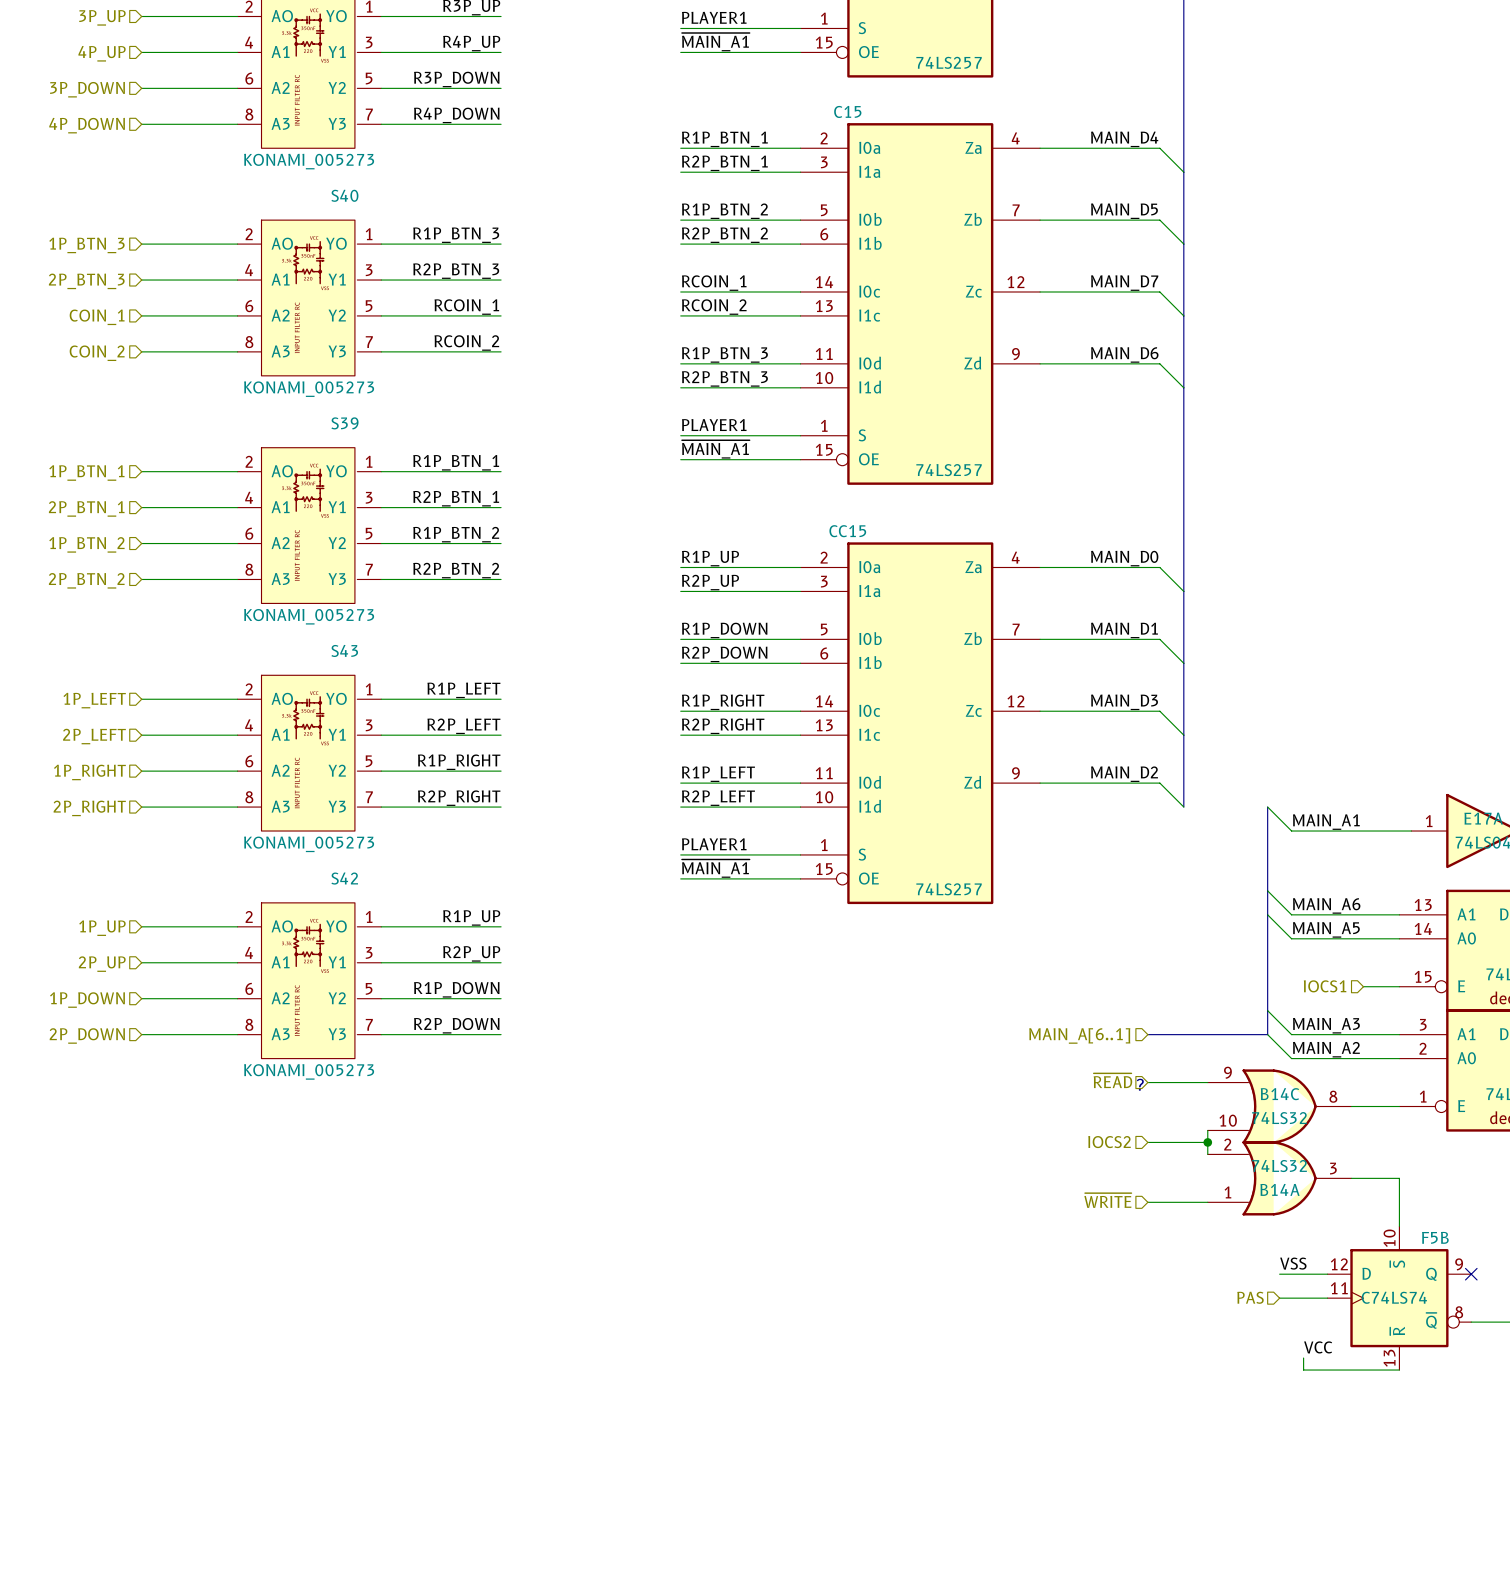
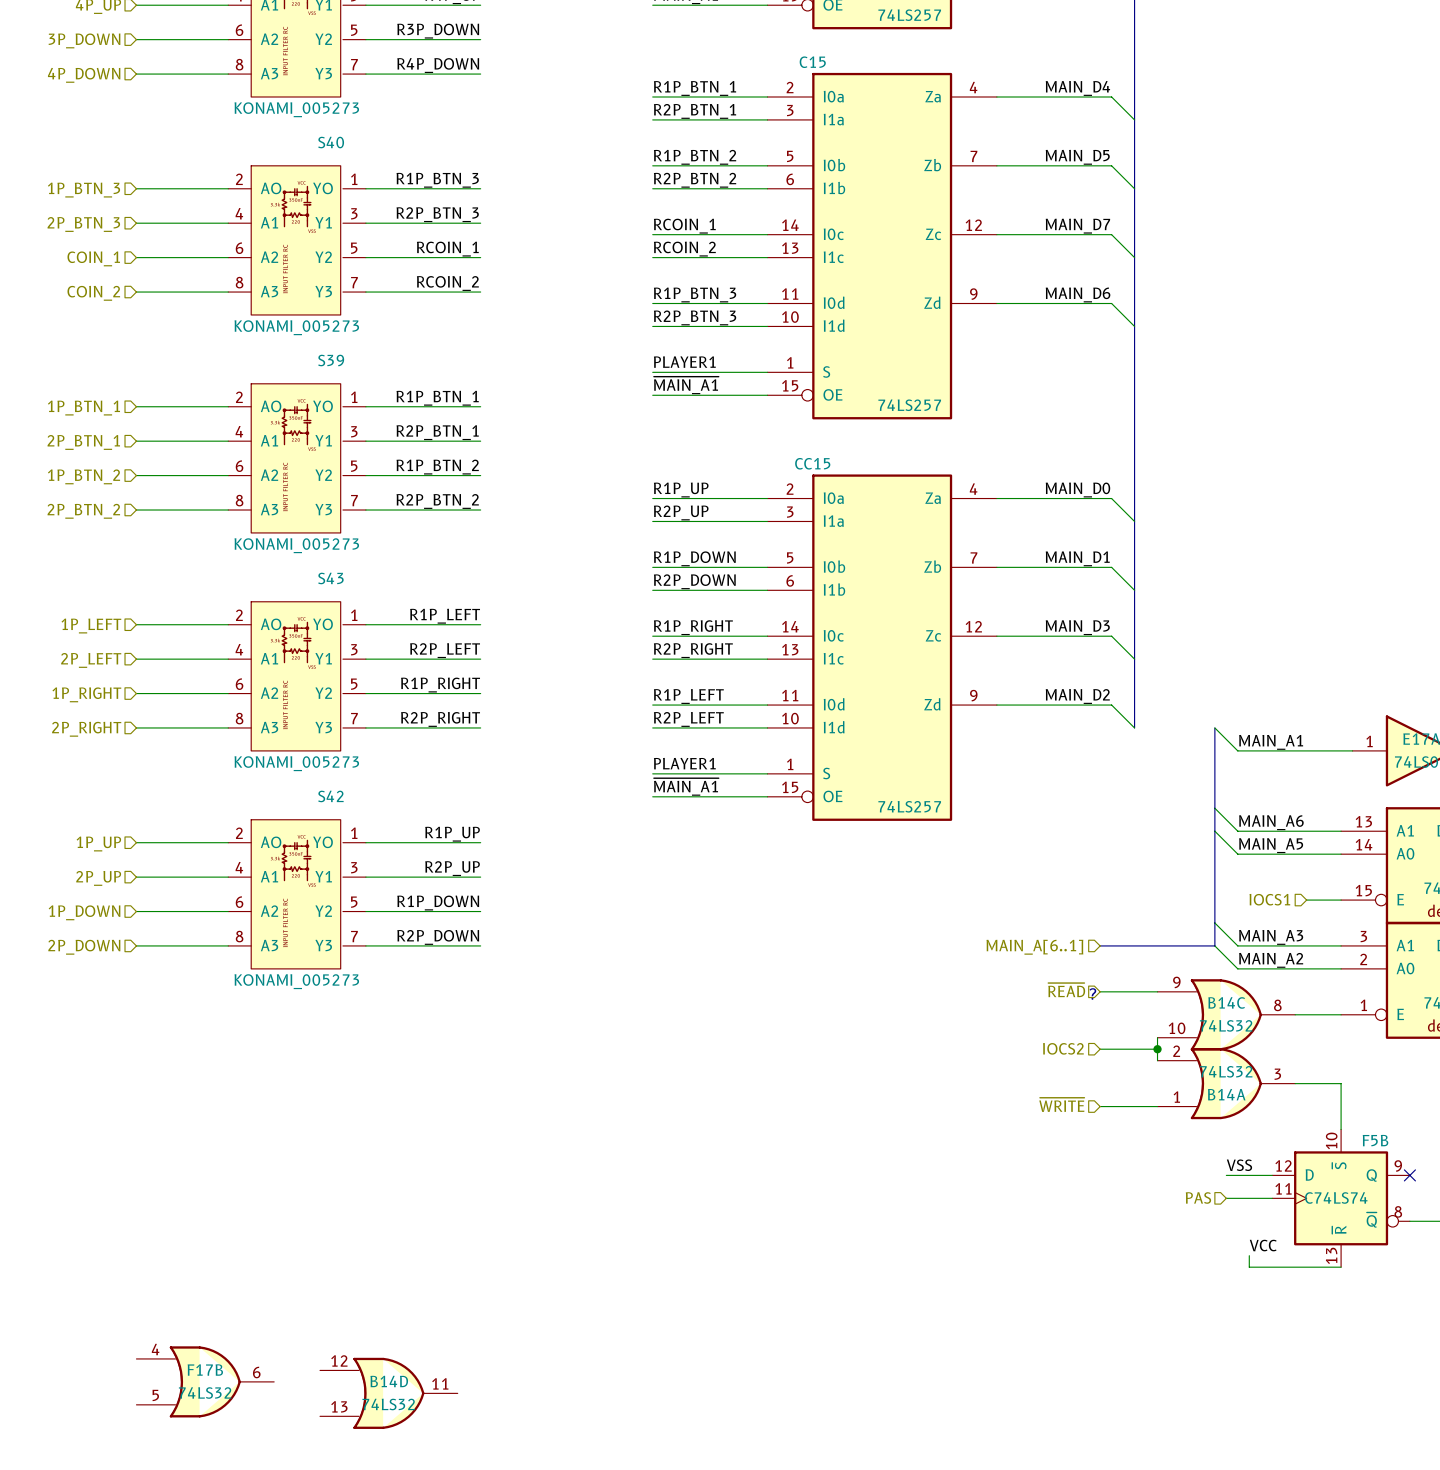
F17B: none -> 74LS32 (205, 1381)
B14D: none -> 74LS32 (388, 1393)

